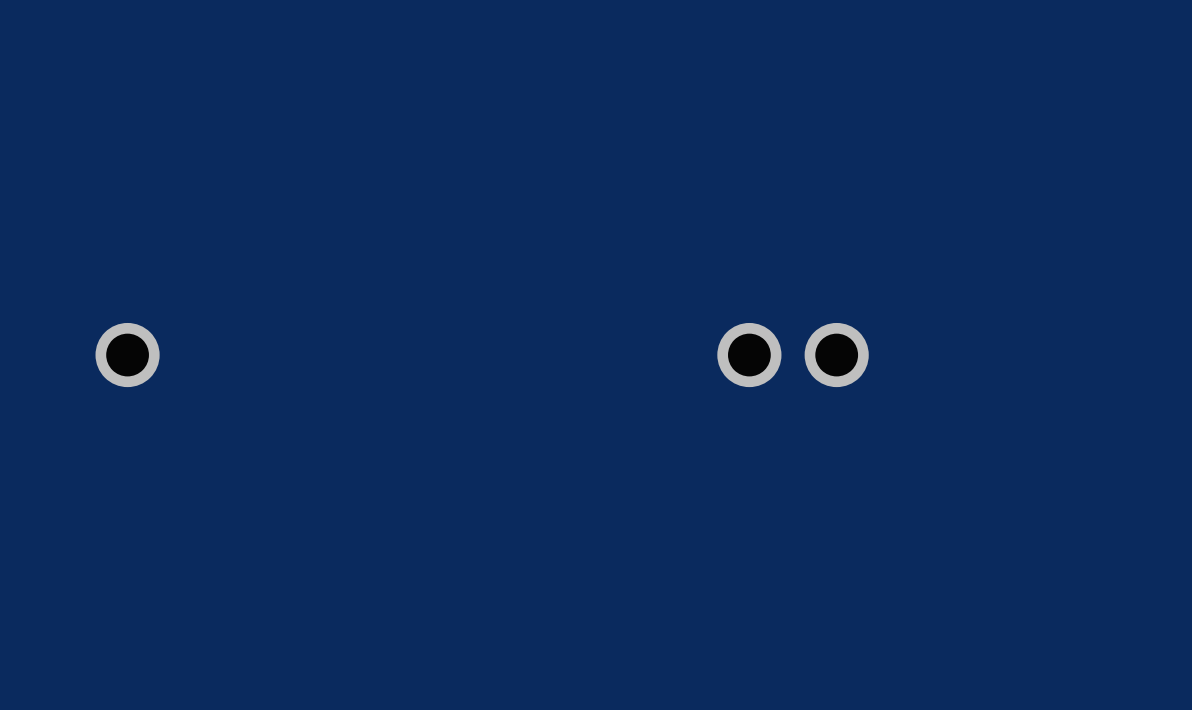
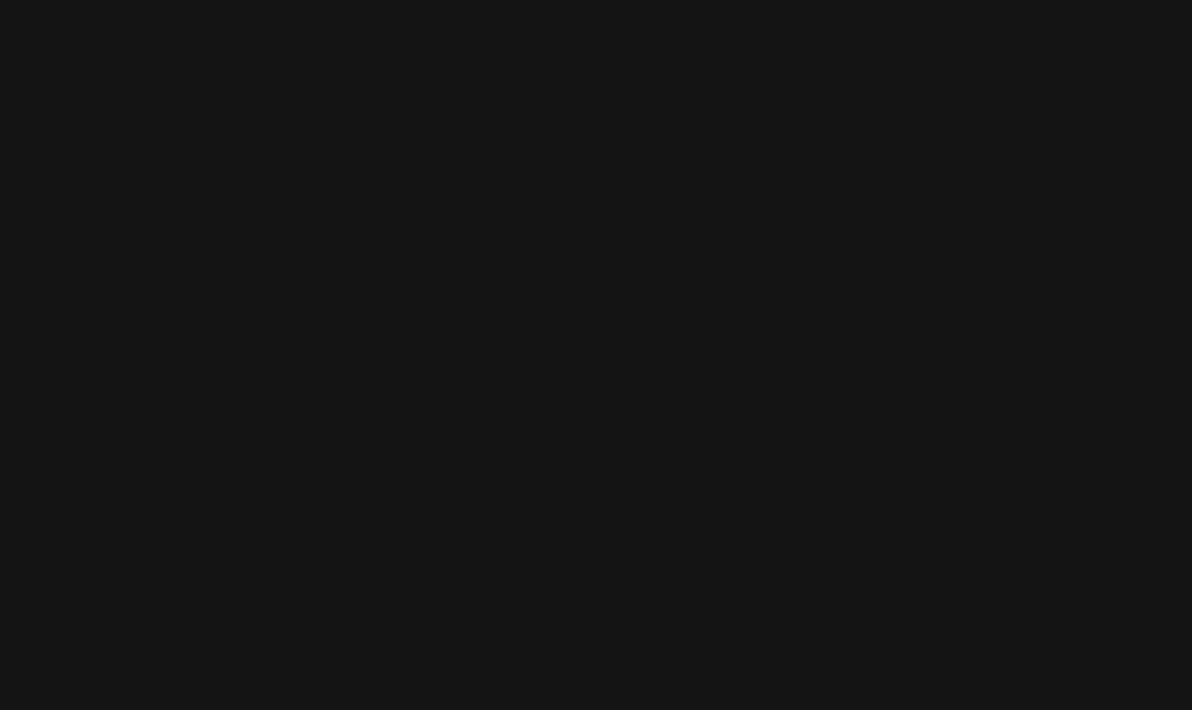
via: (127, 355) -> none
via: (749, 355) -> none
via: (836, 355) -> none

